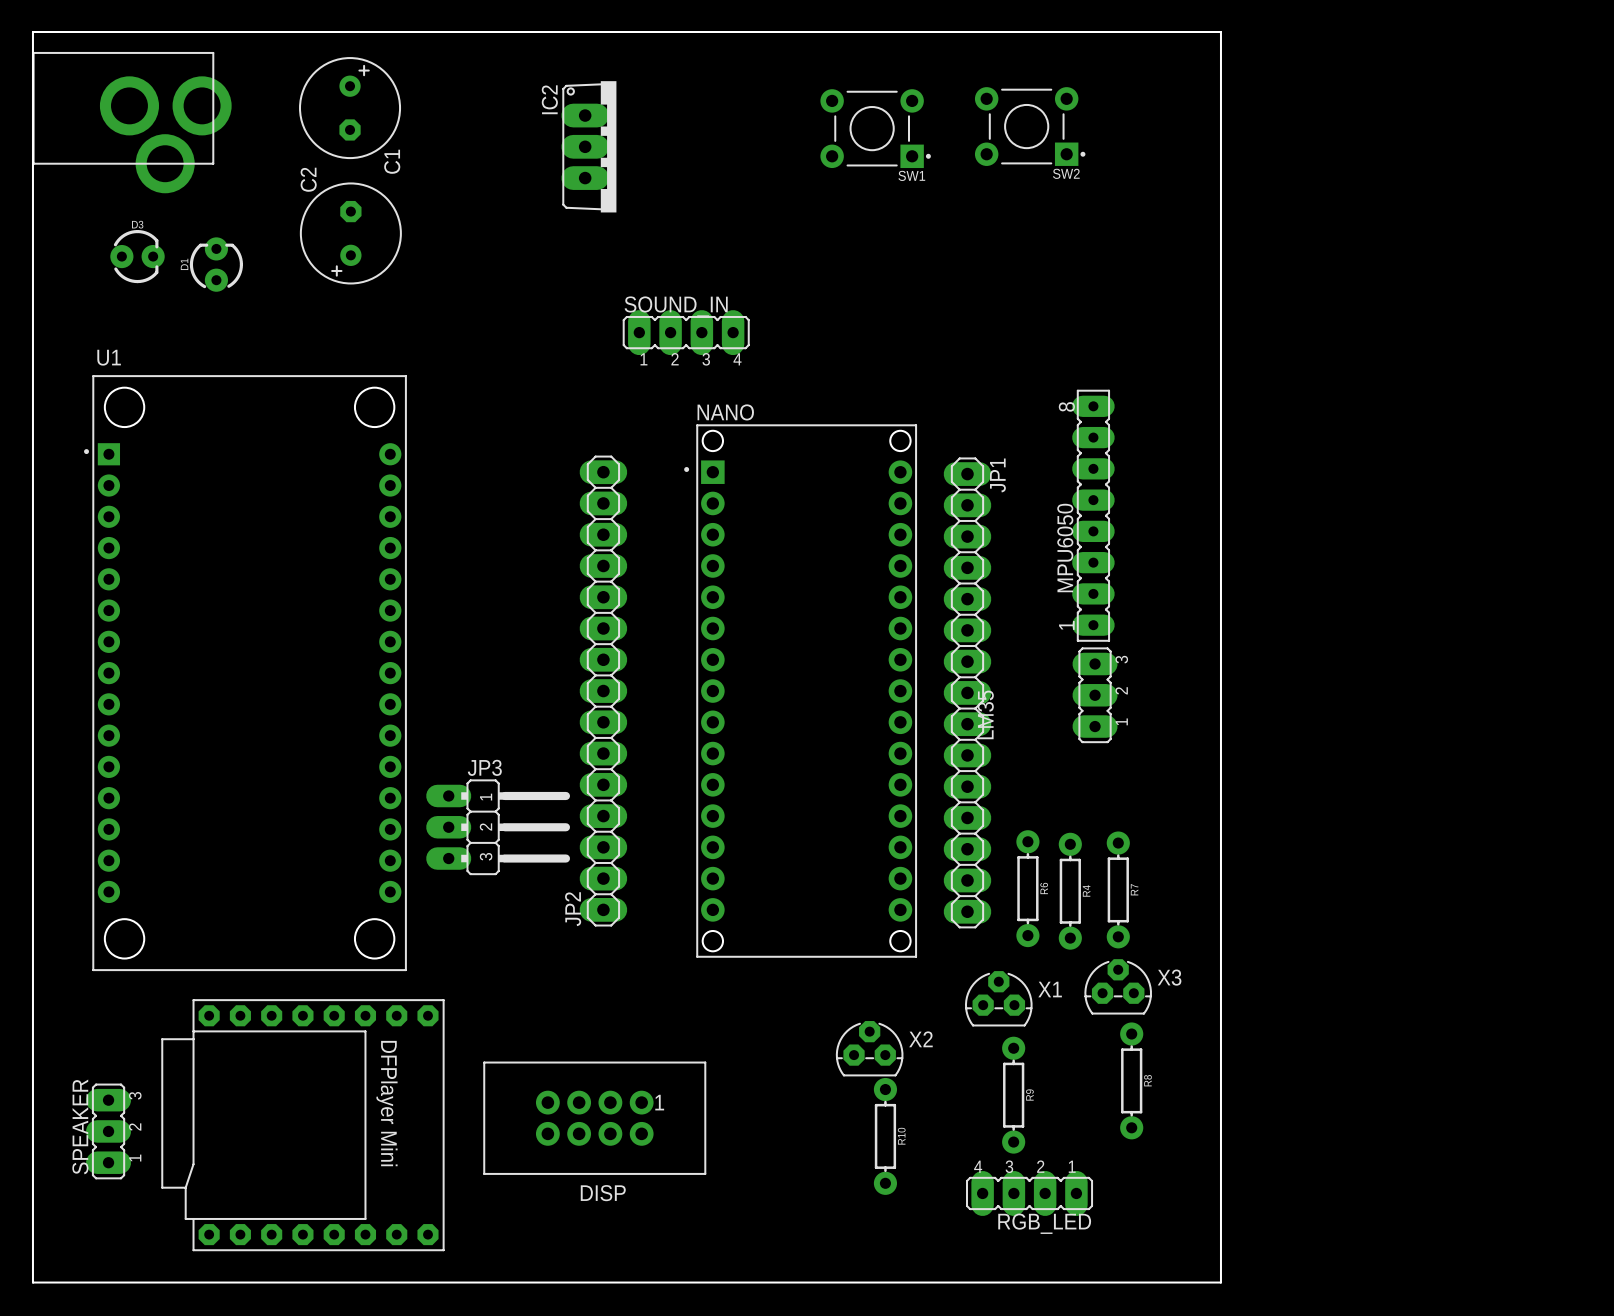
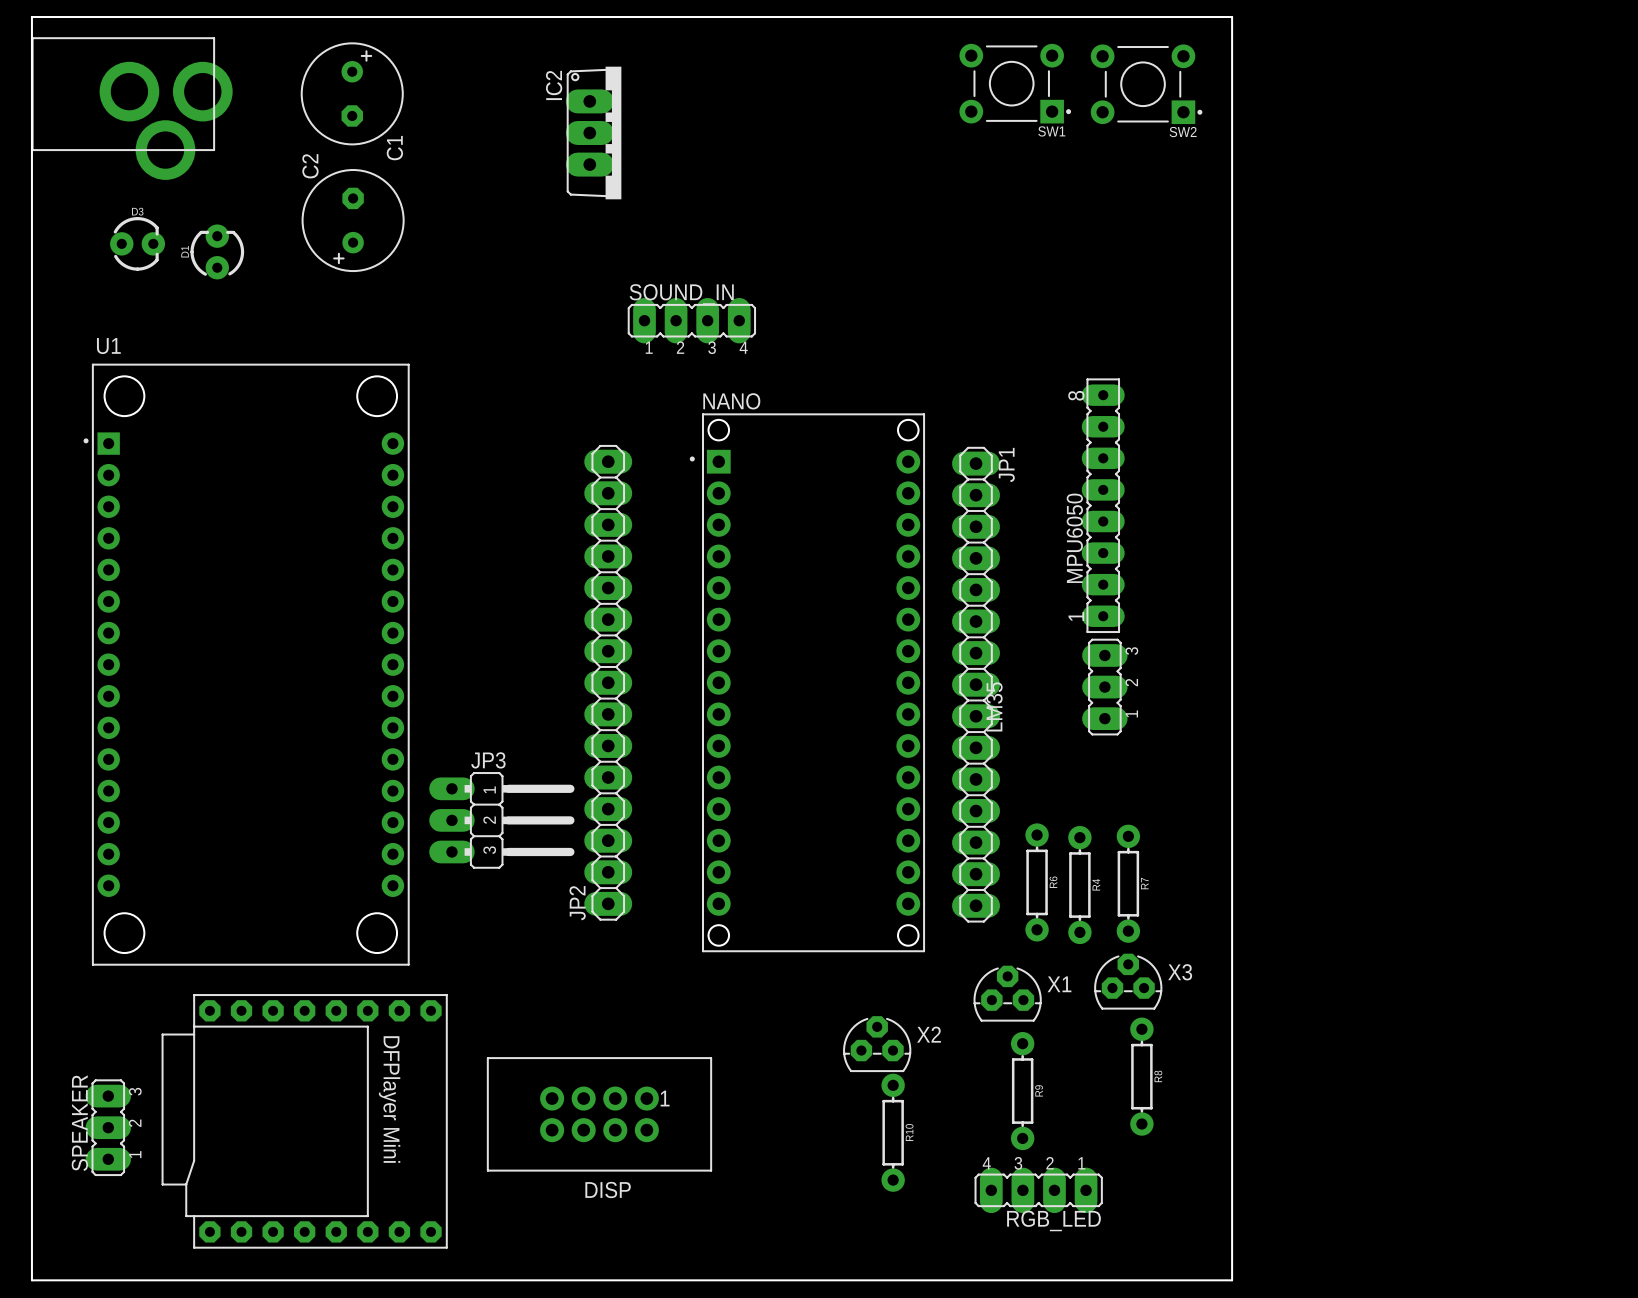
SW2 position: (1030, 126) -> (1146, 84)
SW1 position: (875, 128) -> (1015, 83)

